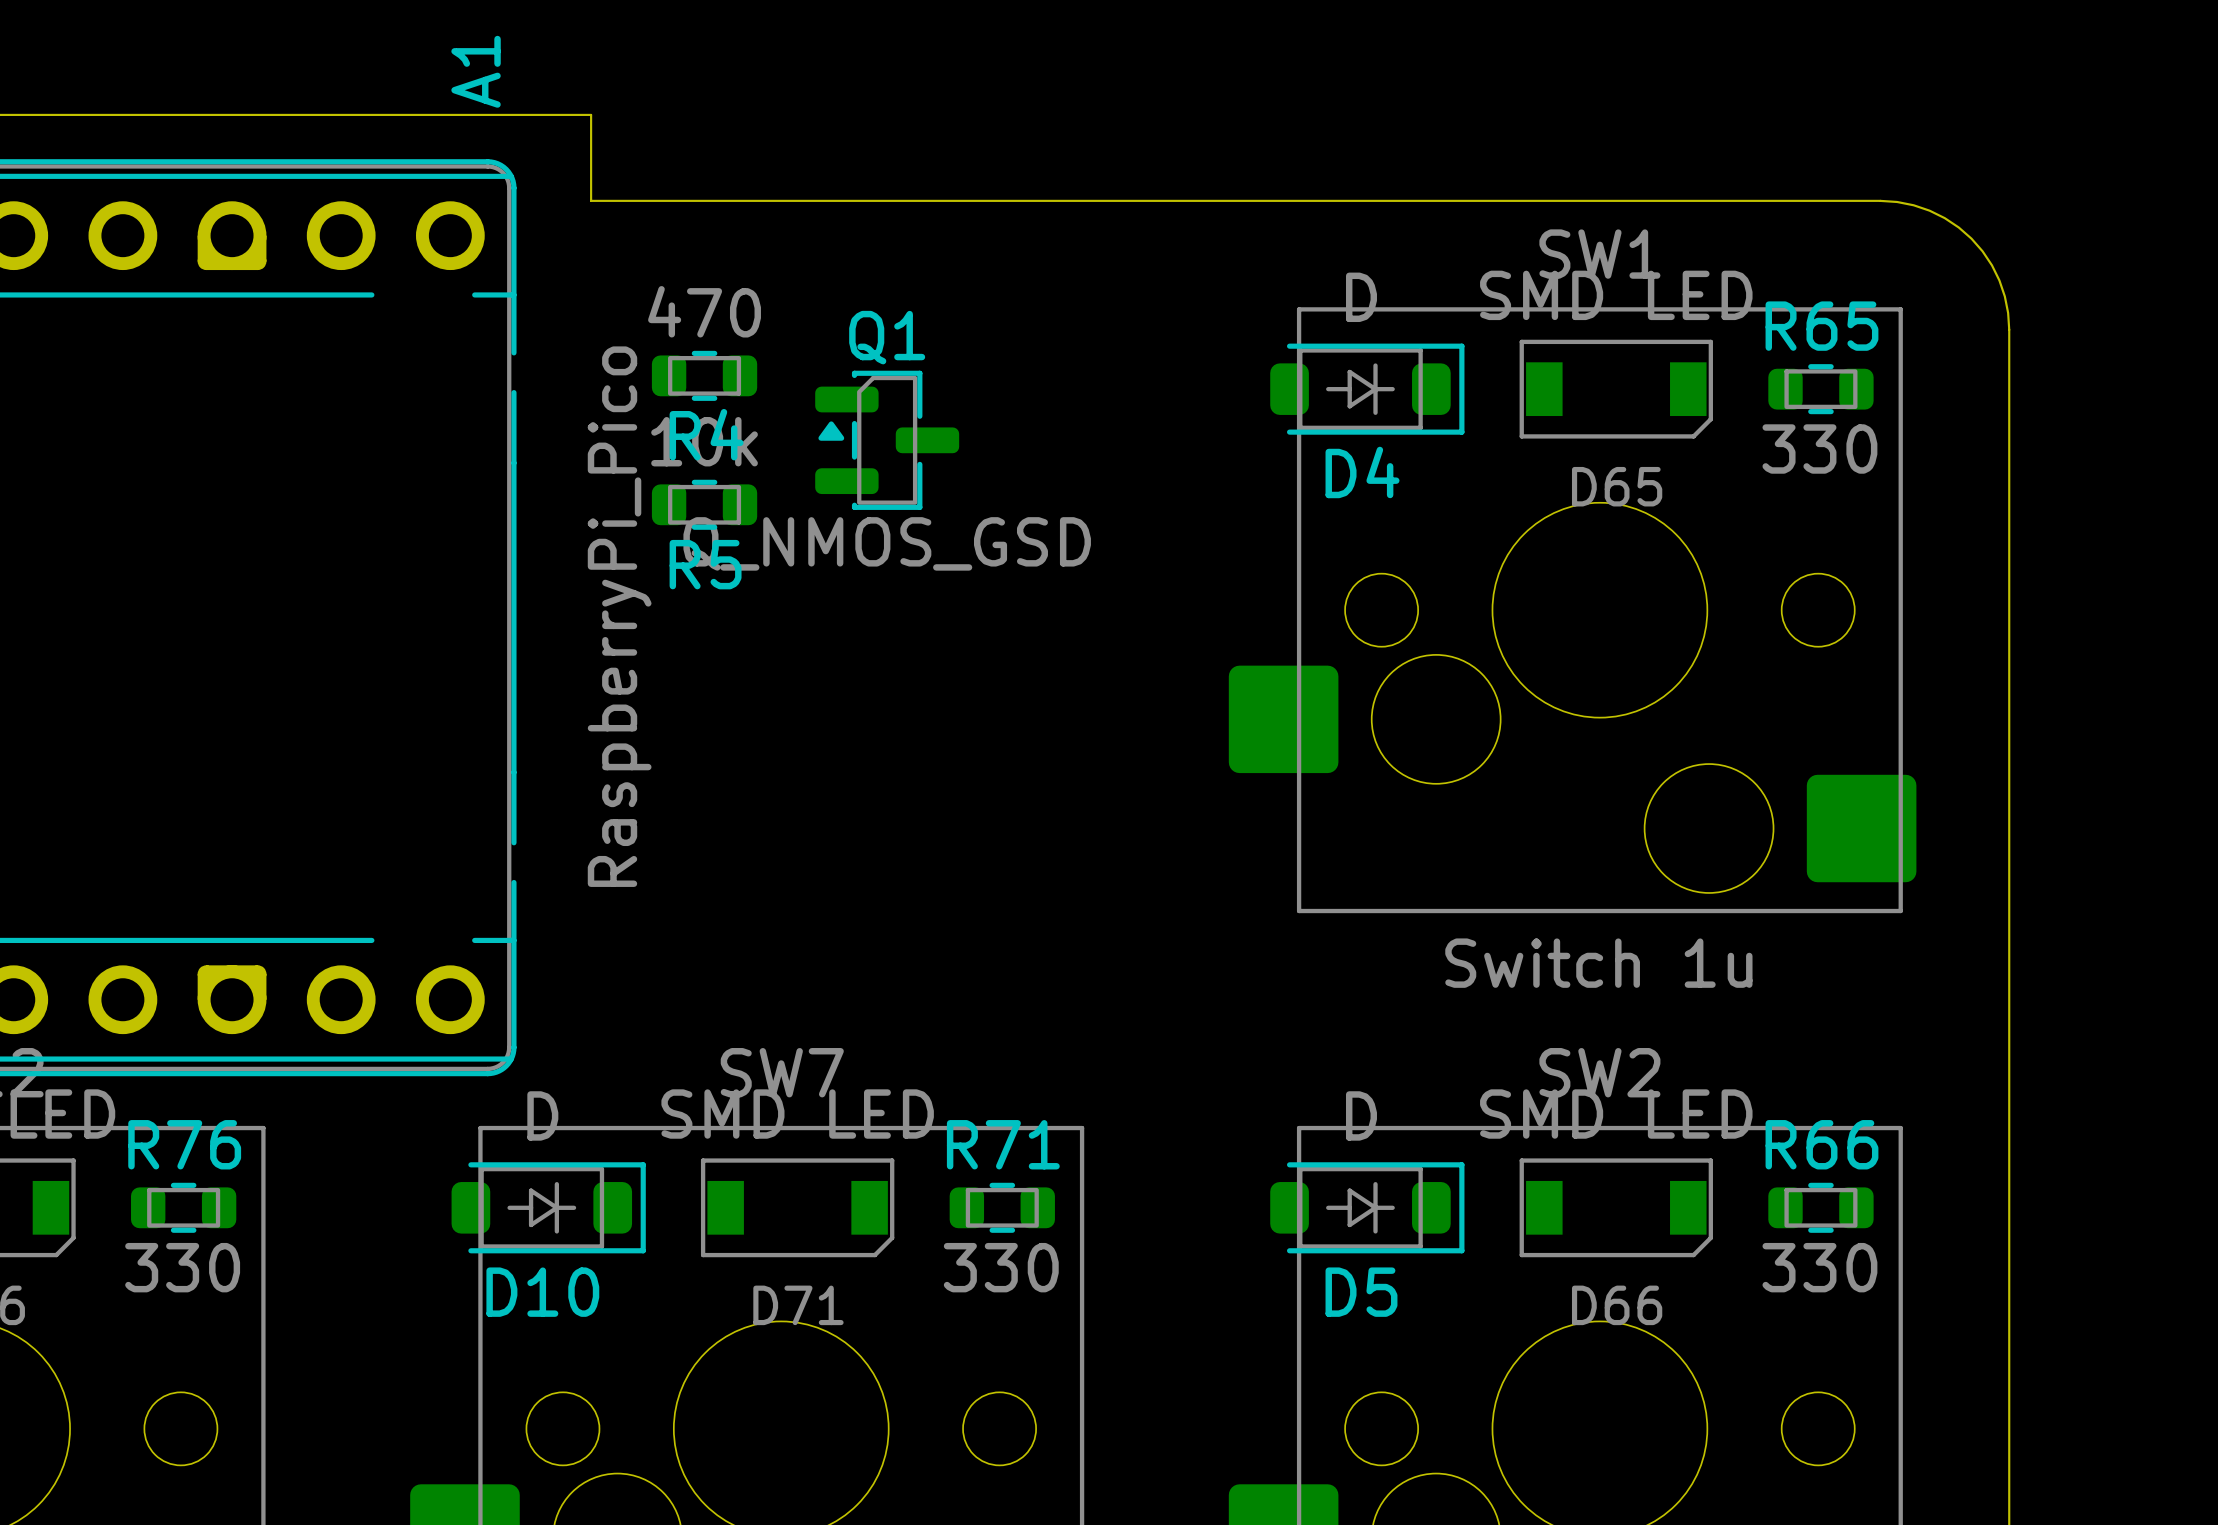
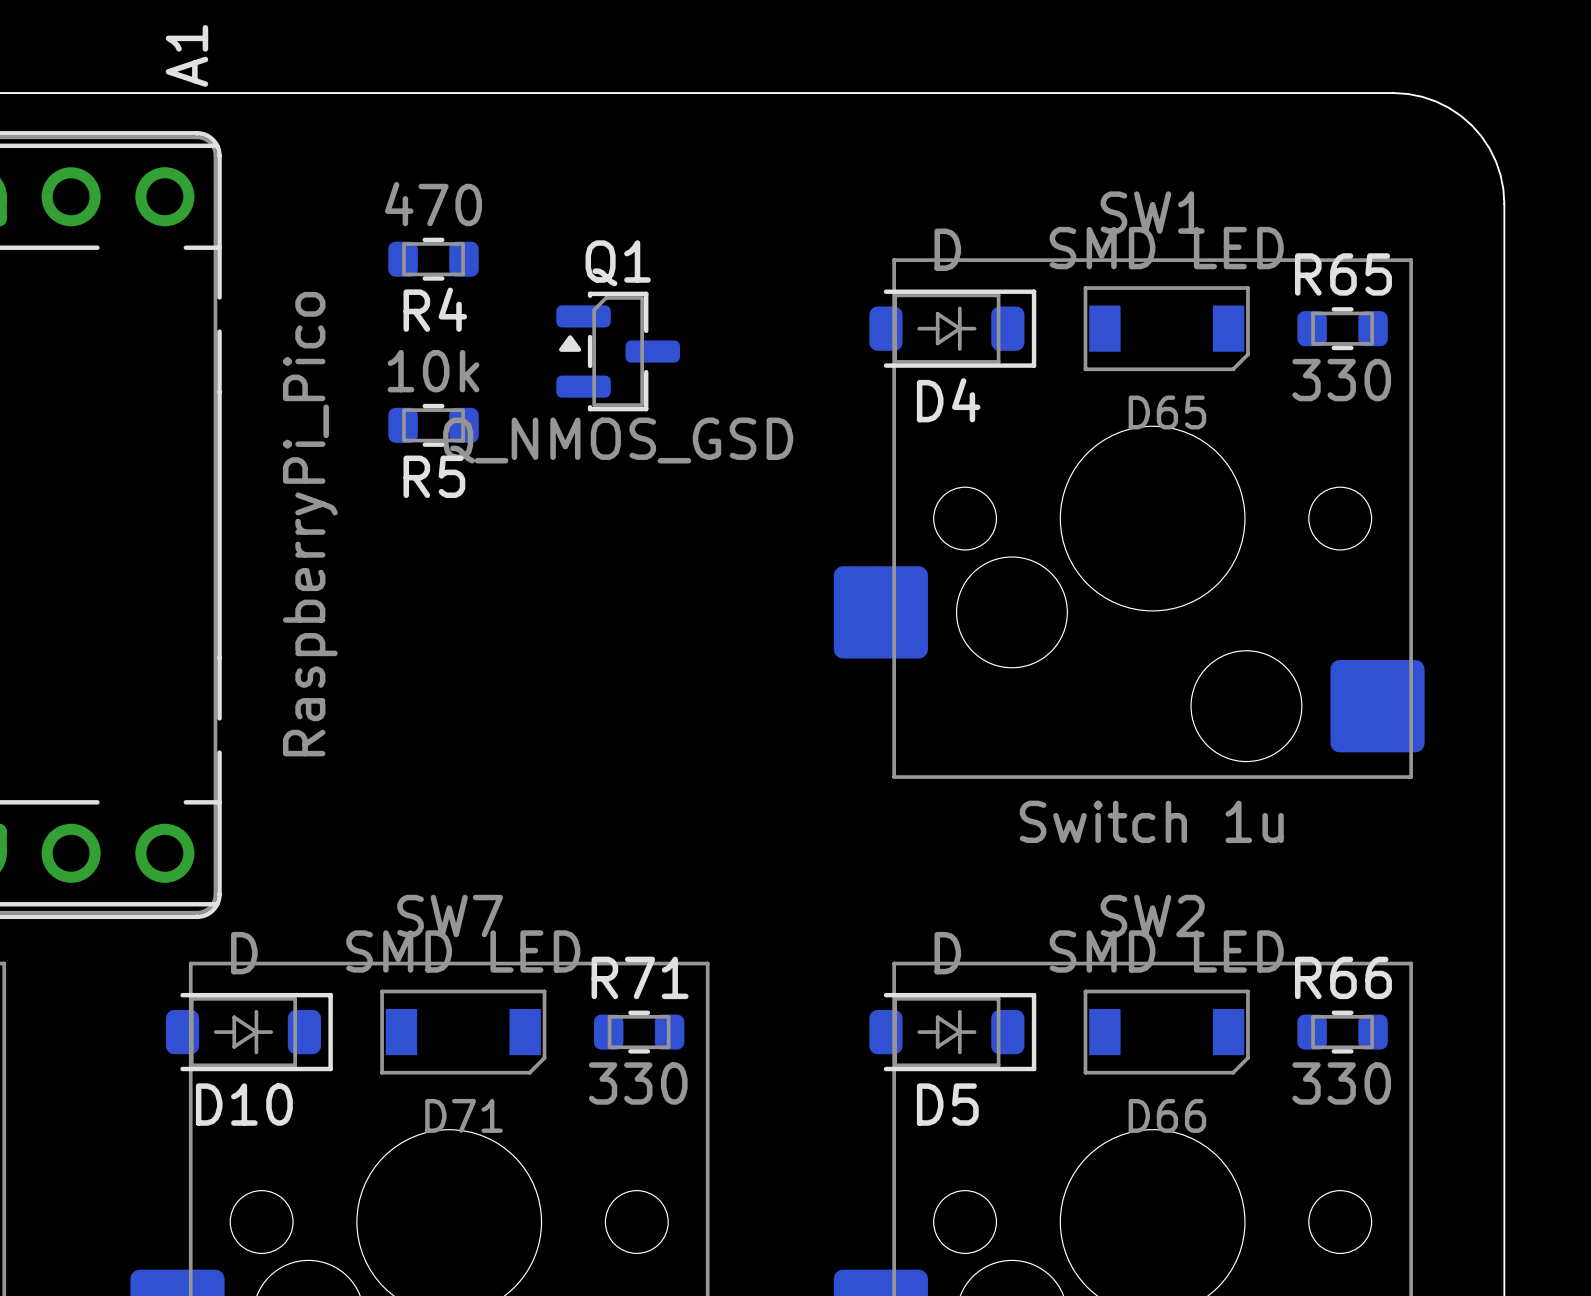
board edge: (591, 114) (591, 200) (1897, 201) (1929, 210) (1944, 218) (1971, 238) (1991, 265) (1999, 280) (2008, 312) (2009, 329) -> (285, 93) (1408, 93) (1422, 96) (1448, 107) (1471, 125) (1489, 148) (1500, 175) (1503, 189) (1504, 277)
R4 position: (704, 375) -> (433, 259)
Q1 position: (887, 440) -> (618, 351)
R5 position: (704, 504) -> (433, 425)

